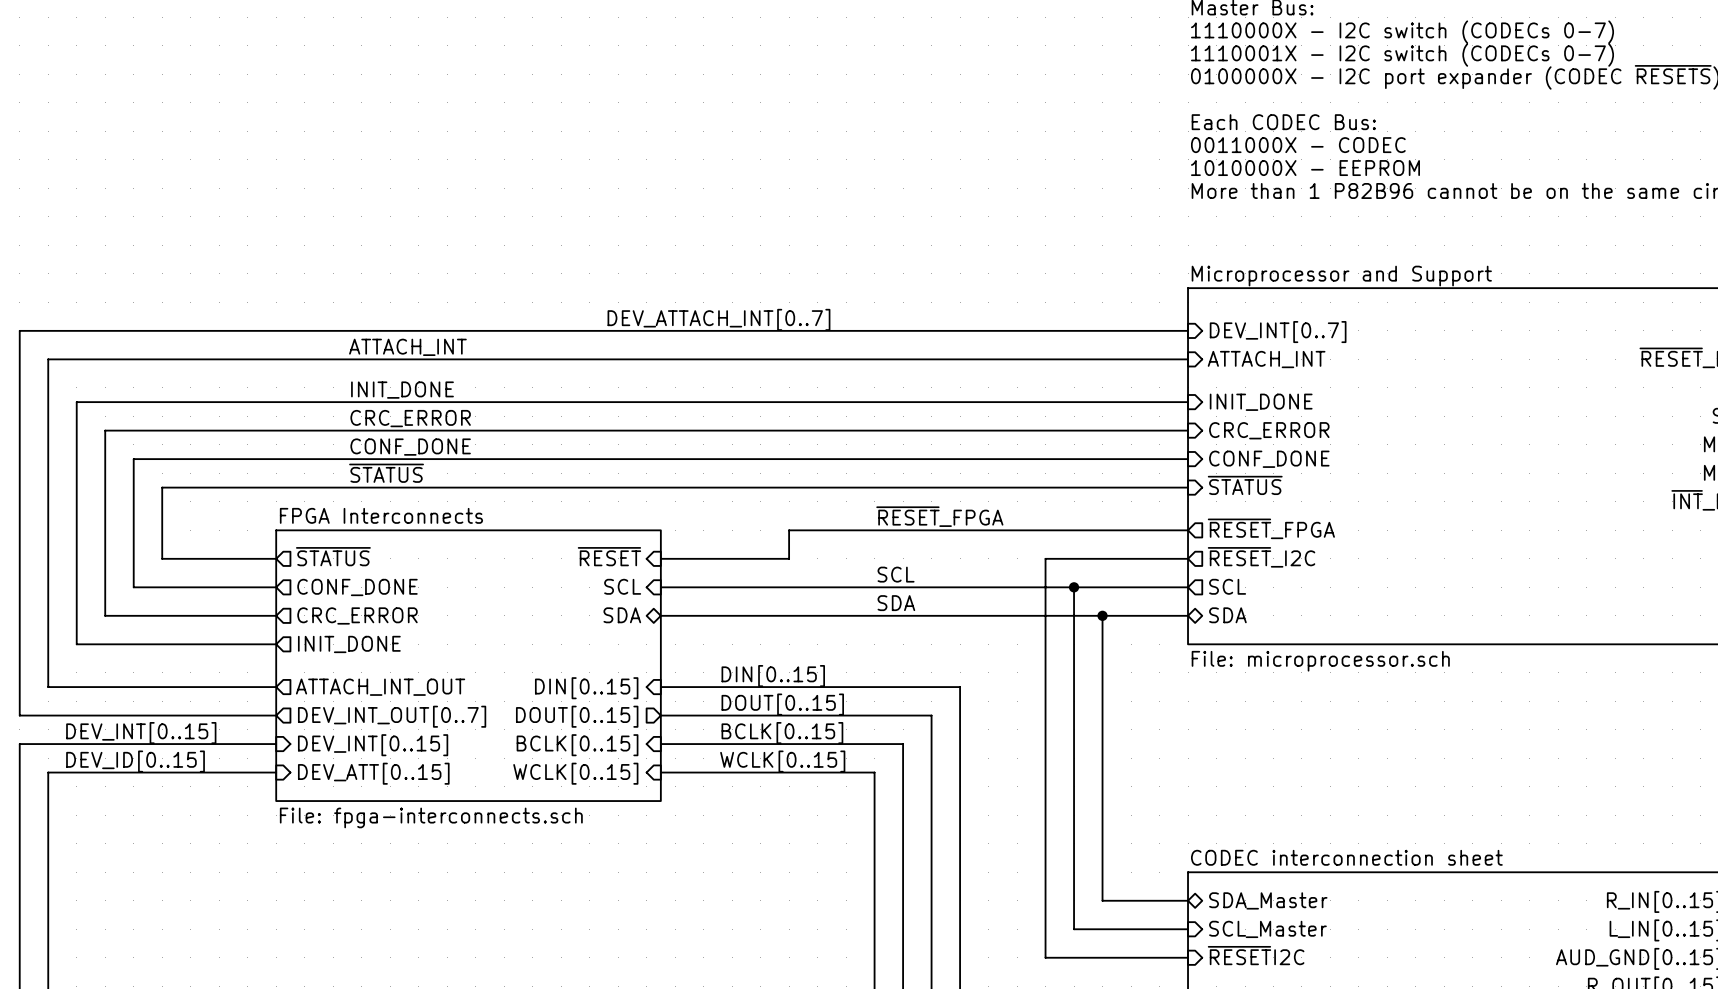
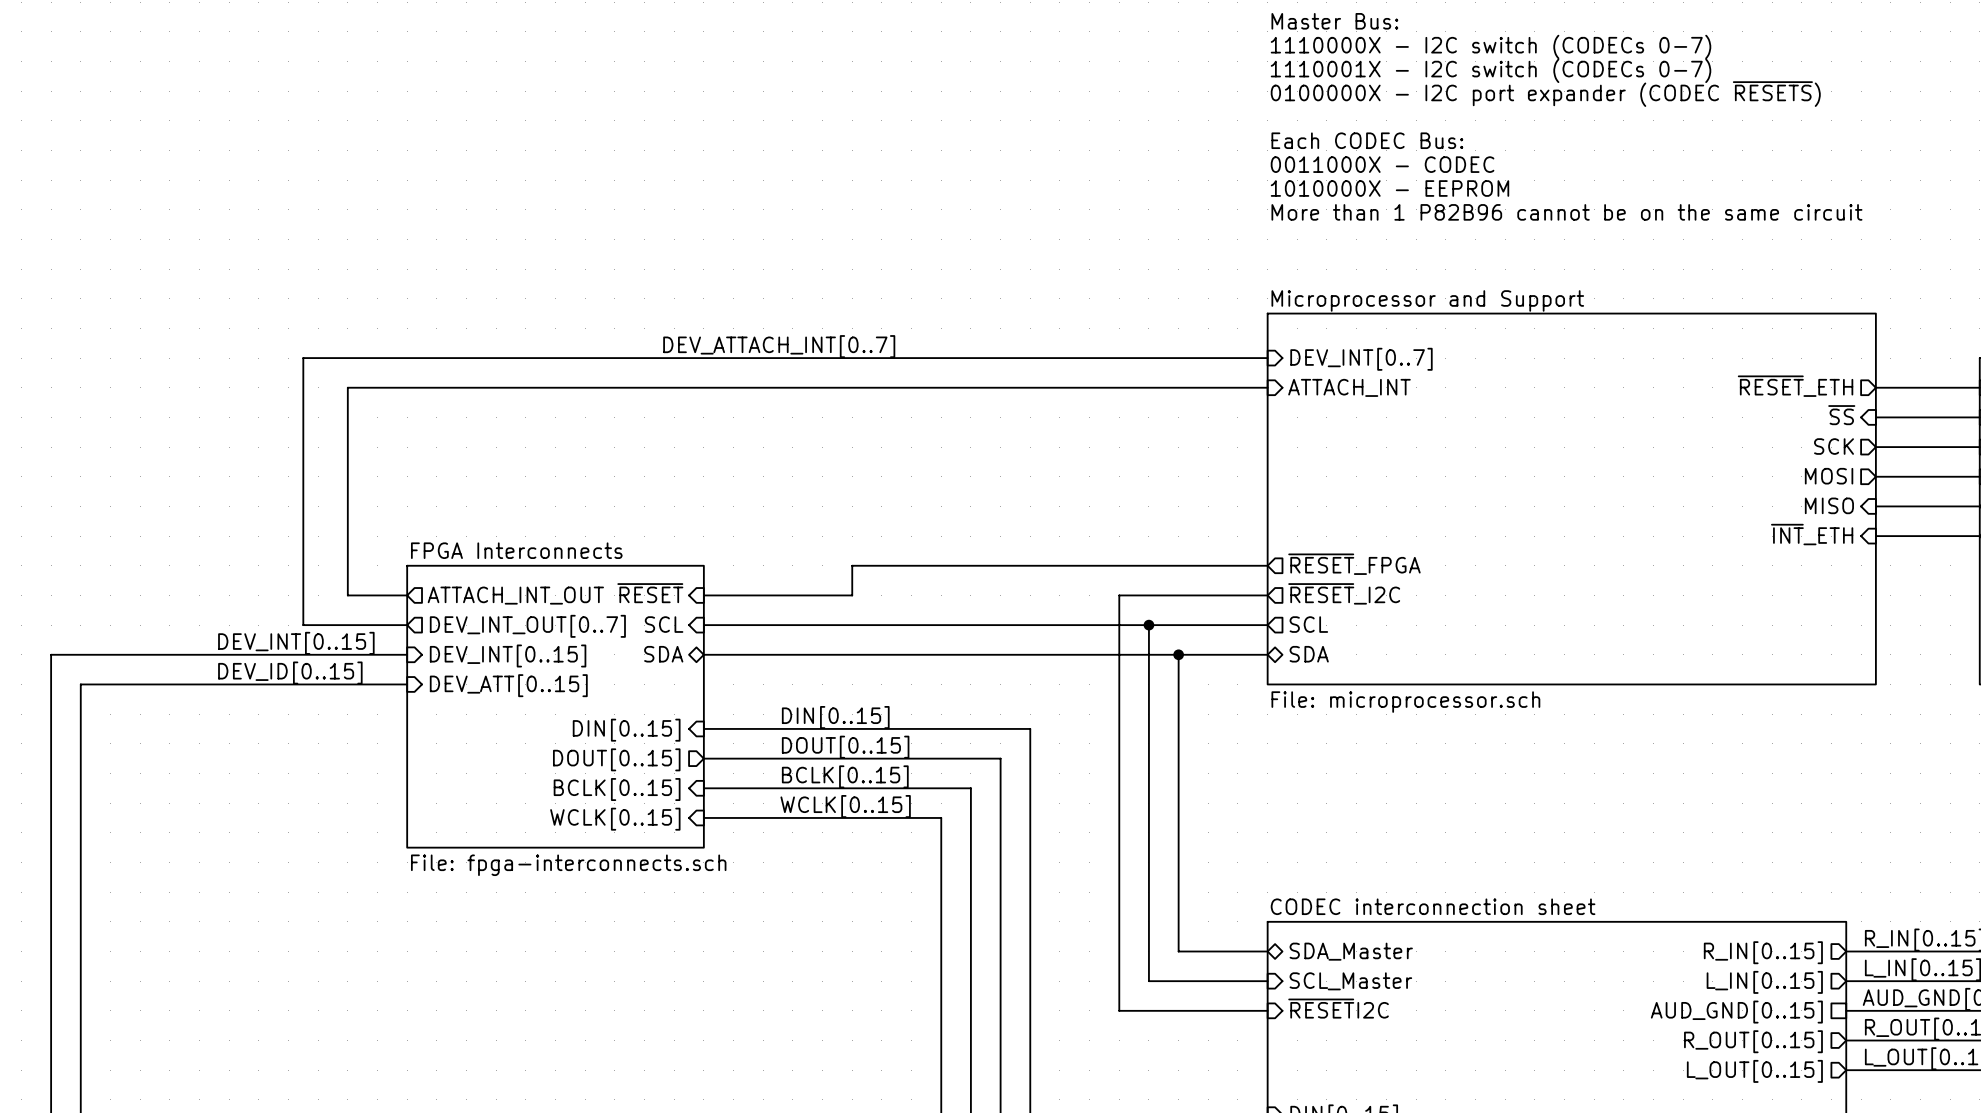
bus: (261, 330) (19, 330) (19, 615) -> (407, 654) (51, 654)
bus: none -> (303, 358) (303, 625) (407, 625)
label: ATTACH_INT (407, 347) -> none
wire: (304, 359) (48, 359) (48, 687) (276, 687) -> (347, 387) (347, 595) (407, 595)
label: INIT_DONE (402, 390) -> none
wire: (1188, 402) (76, 402) (76, 644) (276, 644) -> none
sheet pin: INIT_DONE (1261, 402) -> none
label: CRC_ERROR (410, 418) -> none
wire: (1188, 430) (105, 430) (105, 615) (276, 615) -> none
sheet pin: CRC_ERROR (1269, 430) -> none
label: CONF_DONE (410, 447) -> none
wire: (1188, 459) (133, 459) (133, 587) (276, 587) -> none
sheet pin: CONF_DONE (1269, 459) -> none
label: ~{STATUS} (386, 473) -> none
sheet pin: ~{STATUS} (1245, 485) -> none
wire: (1188, 487) (162, 487) (162, 558) (276, 558) -> none
label: ~{RESET}_FPGA (939, 516) -> none
sheet pin: ~{STATUS} (333, 556) -> none
sheet pin position: ~{RESET} (609, 556) -> ~{RESET} (650, 593)
wire: none -> (703, 595) (718, 595)
label: SCL (896, 574) -> none
sheet pin position: SCL (622, 586) -> SCL (664, 624)
sheet pin: CONF_DONE (357, 587) -> none
wire: none -> (703, 625) (718, 625)
label: SDA (896, 603) -> none
sheet pin: CRC_ERROR (357, 615) -> none
sheet pin position: SDA (622, 615) -> SDA (663, 654)
wire: none -> (703, 654) (718, 654)
sheet pin: INIT_DONE (349, 644) -> none
sheet FPGA Interconnects: File: fpga-interconnects.sch (468, 665) -> none
sheet FPGA Interconnects: none -> File: fpga-interconnects.sch (555, 706)
sheet pin position: ATTACH_INT_OUT (380, 687) -> ATTACH_INT_OUT (515, 595)
bus: none -> (703, 728) (718, 728)
sheet pin position: DIN[0..15] (586, 688) -> DIN[0..15] (626, 730)
bus: (19, 715) (276, 715) -> (51, 758) (51, 788)
bus: none -> (703, 758) (718, 758)
sheet pin position: DEV_INT_OUT[0..7] (392, 716) -> DEV_INT_OUT[0..7] (527, 626)
sheet pin position: DOUT[0..15] (577, 716) -> DOUT[0..15] (616, 759)
label position: DEV_INT[0..15] (141, 733) -> DEV_INT[0..15] (296, 643)
bus: (19, 744) (276, 744) -> none
bus: none -> (703, 788) (718, 788)
sheet pin position: DEV_INT[0..15] (373, 745) -> DEV_INT[0..15] (508, 655)
sheet pin position: BCLK[0..15] (577, 745) -> BCLK[0..15] (617, 789)
label position: DEV_ID[0..15] (135, 761) -> DEV_ID[0..15] (290, 672)
bus: (48, 772) (276, 772) -> (80, 817) (80, 684) (407, 684)
bus: none -> (703, 817) (718, 817)
sheet pin position: DEV_ATT[0..15] (373, 773) -> DEV_ATT[0..15] (508, 685)
sheet pin position: WCLK[0..15] (575, 773) -> WCLK[0..15] (615, 819)

